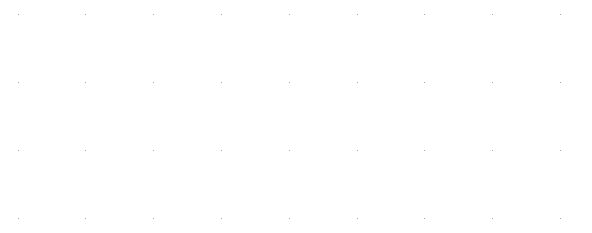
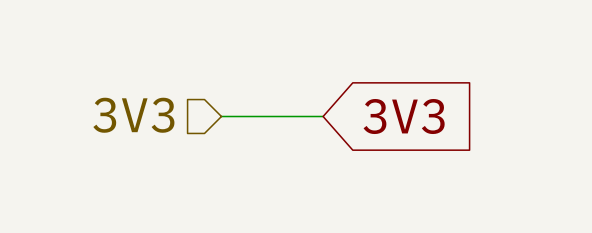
hierarchical label: none -> 3V3 (133, 115)
wire: none -> (221, 116) (323, 116)
global label: none -> 3V3 (404, 116)

